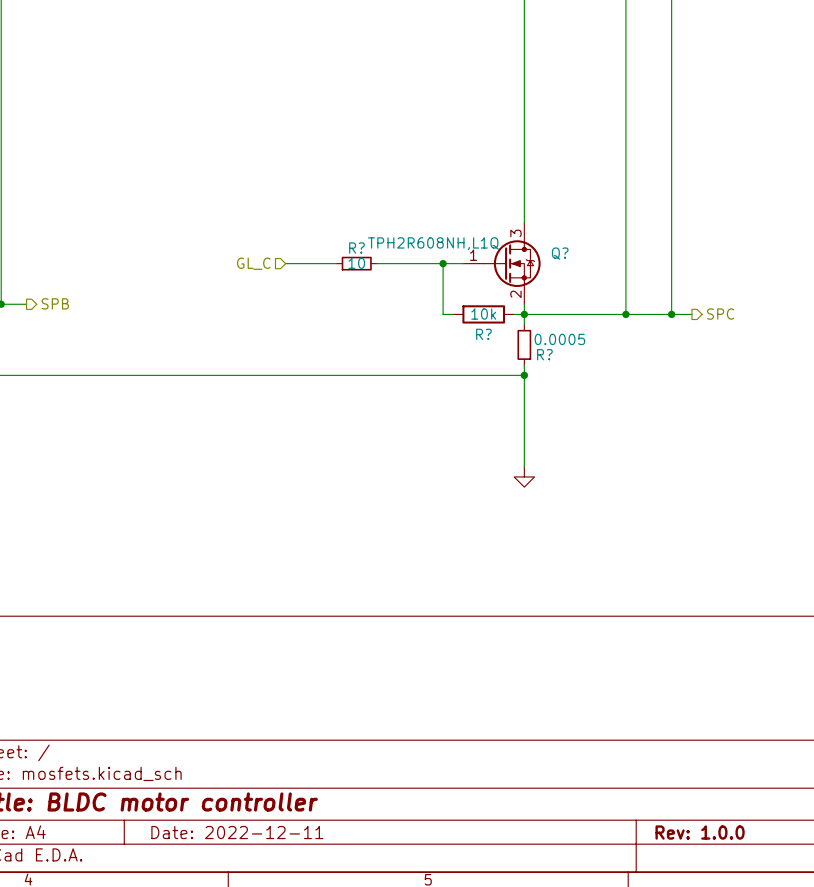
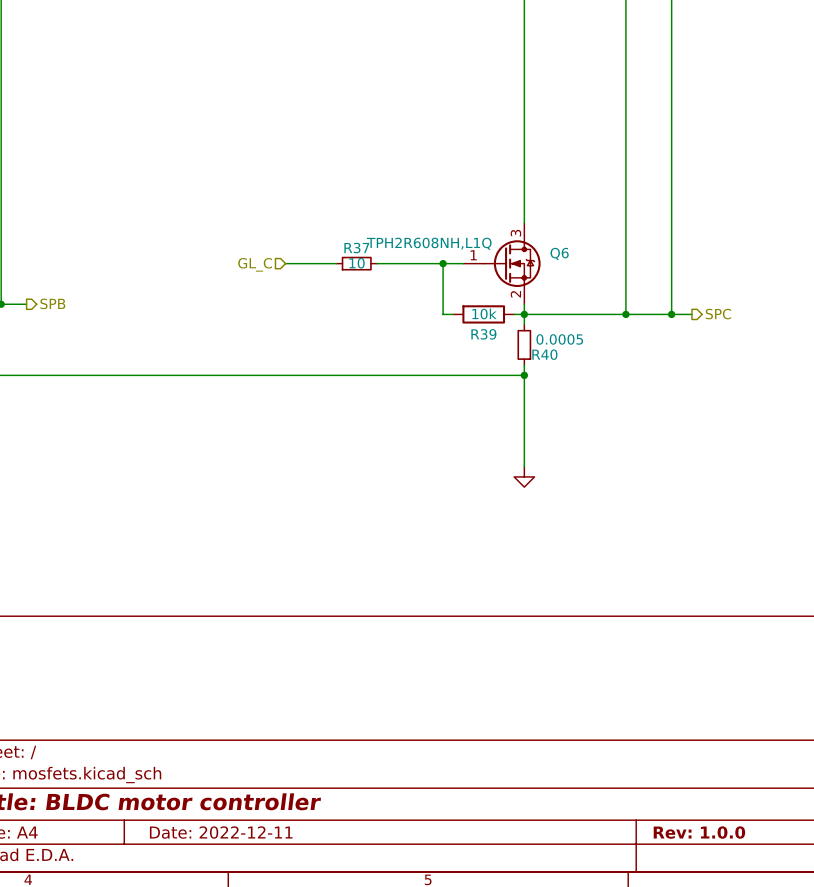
R? name: R? (356, 248) -> R37 (356, 248)
Q? name: Q? (560, 253) -> Q6 (559, 253)
R? name: R? (483, 334) -> R39 (483, 334)
R? name: R? (544, 354) -> R40 (544, 354)

